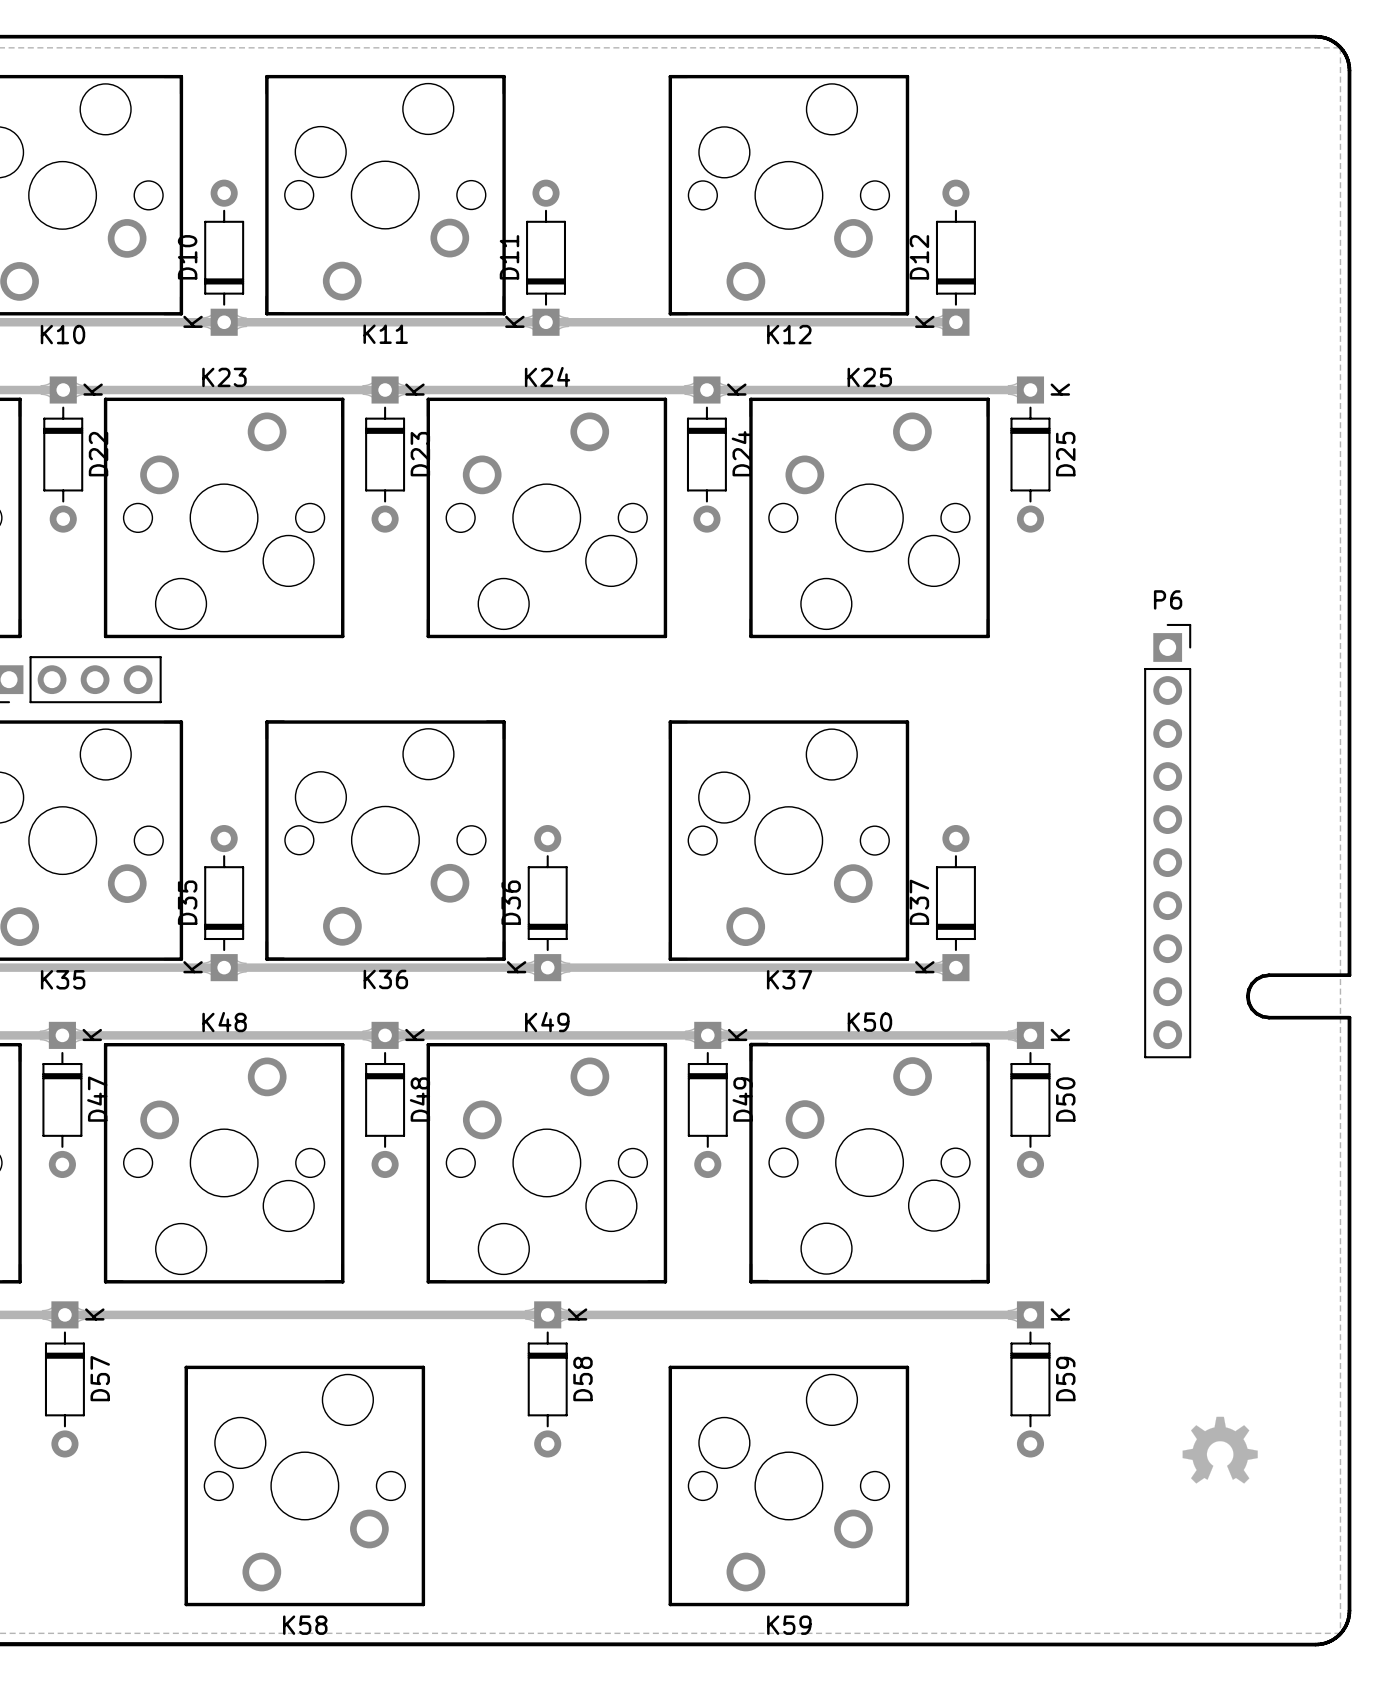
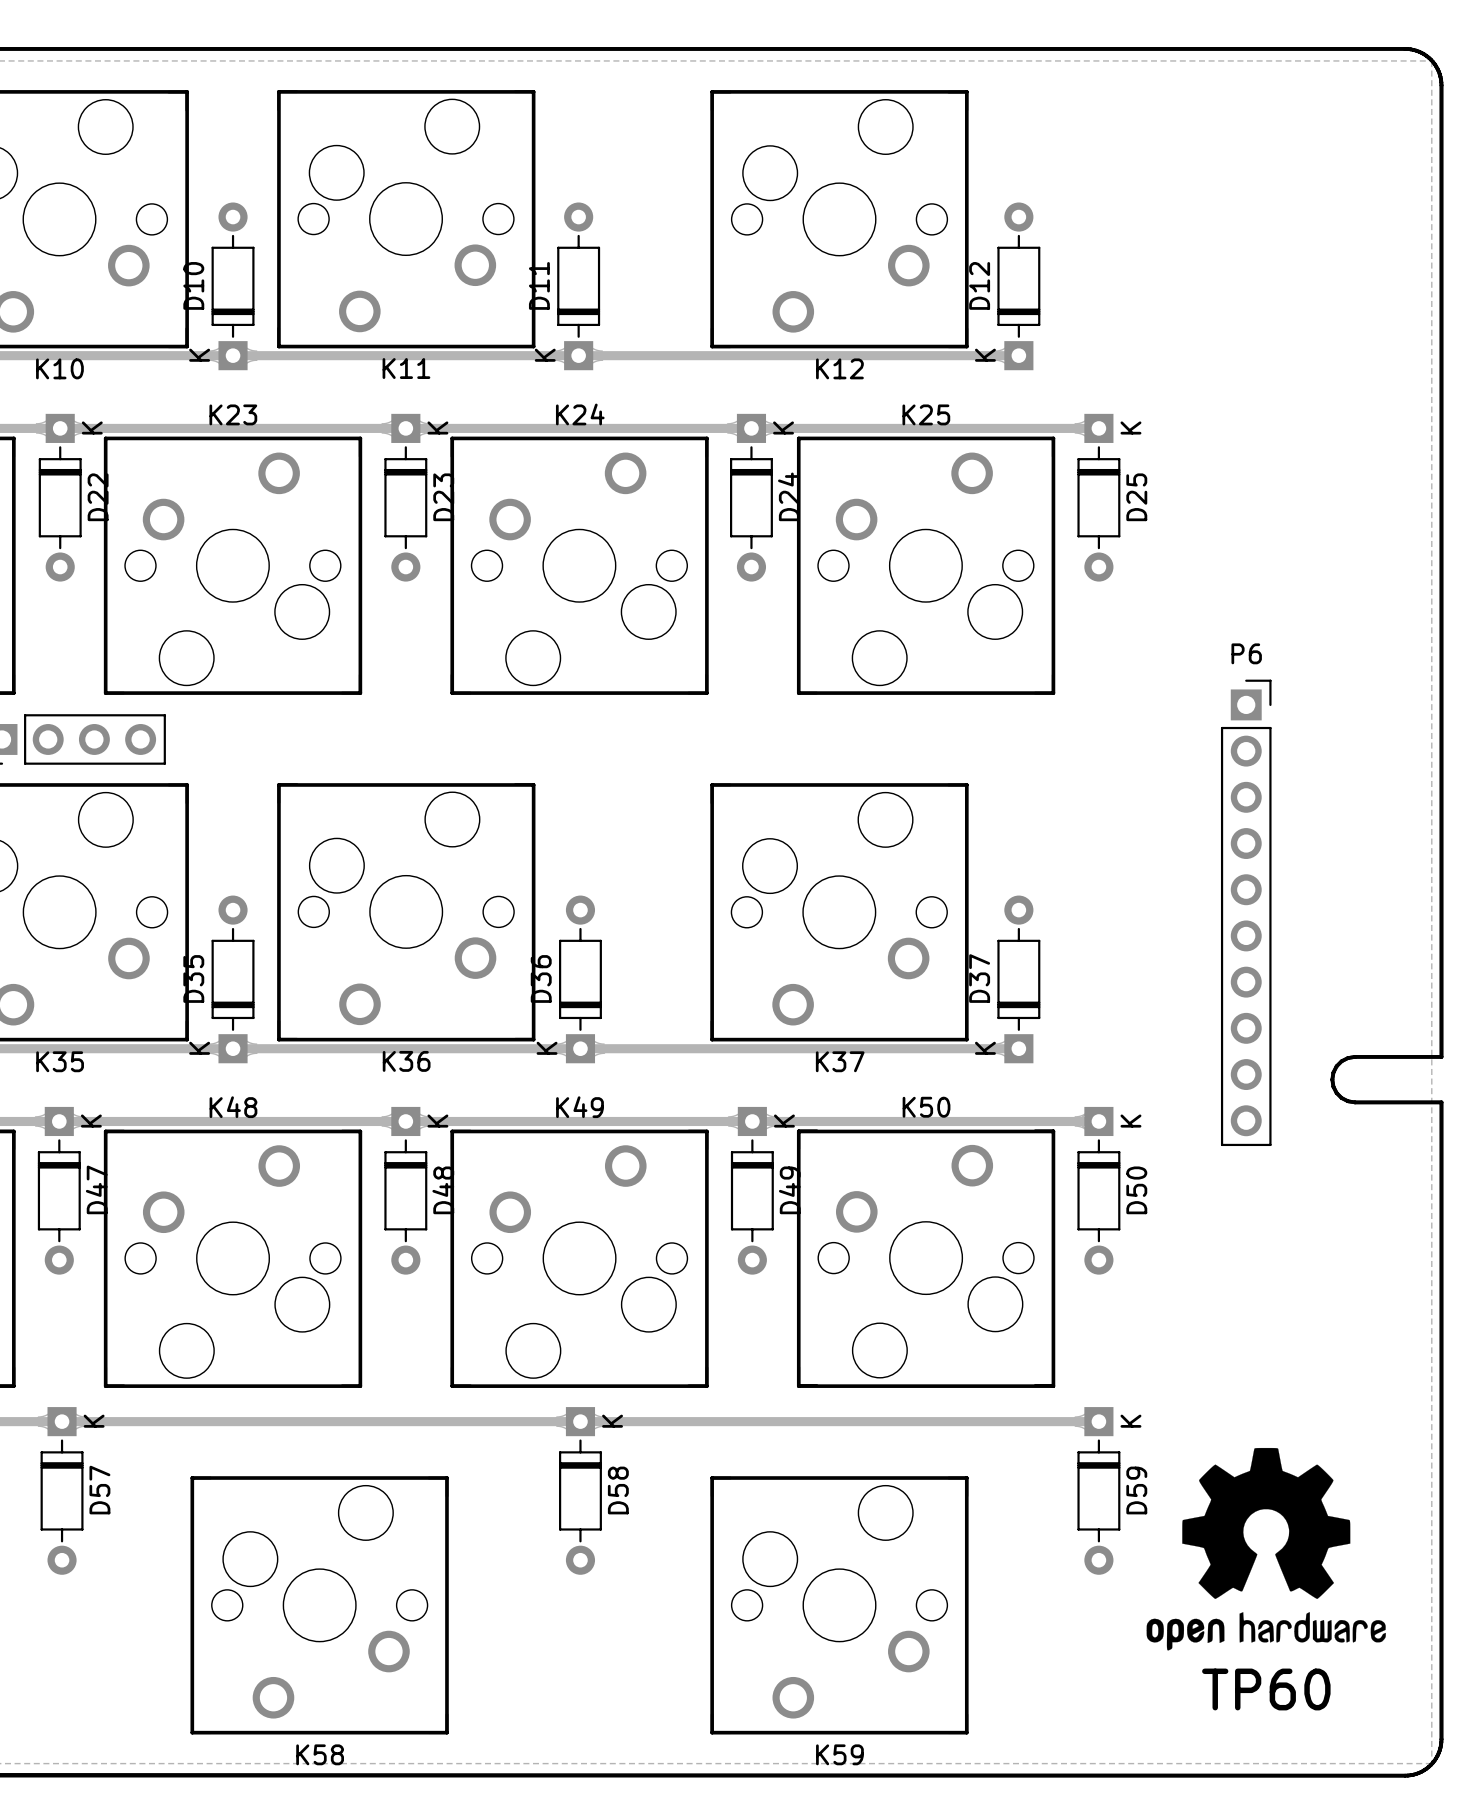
drawing: none -> [1146, 1447, 1386, 1651]
drawing: [1182, 1416, 1258, 1484] -> none
text: none -> TP60 (1266, 1689)

